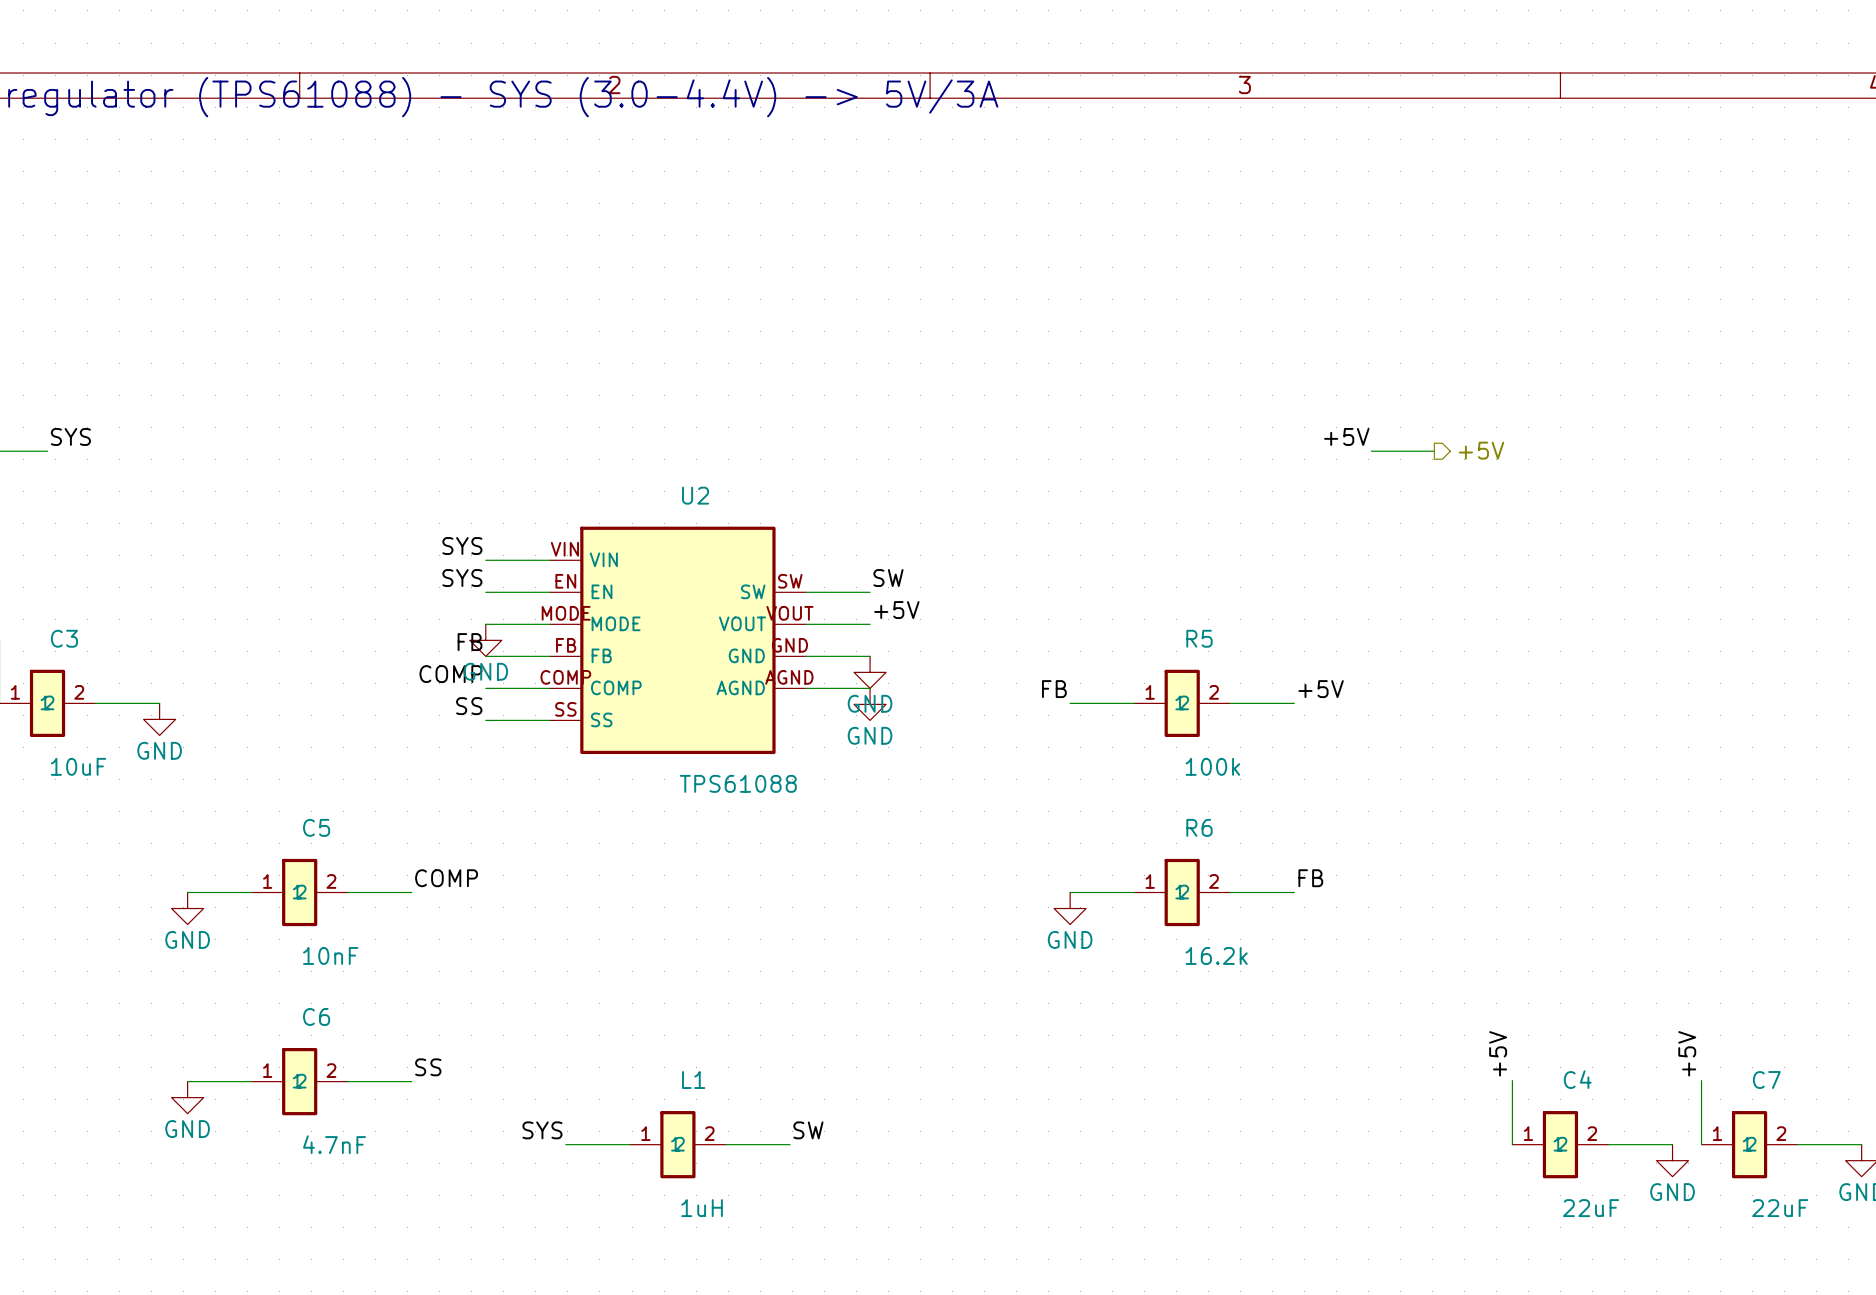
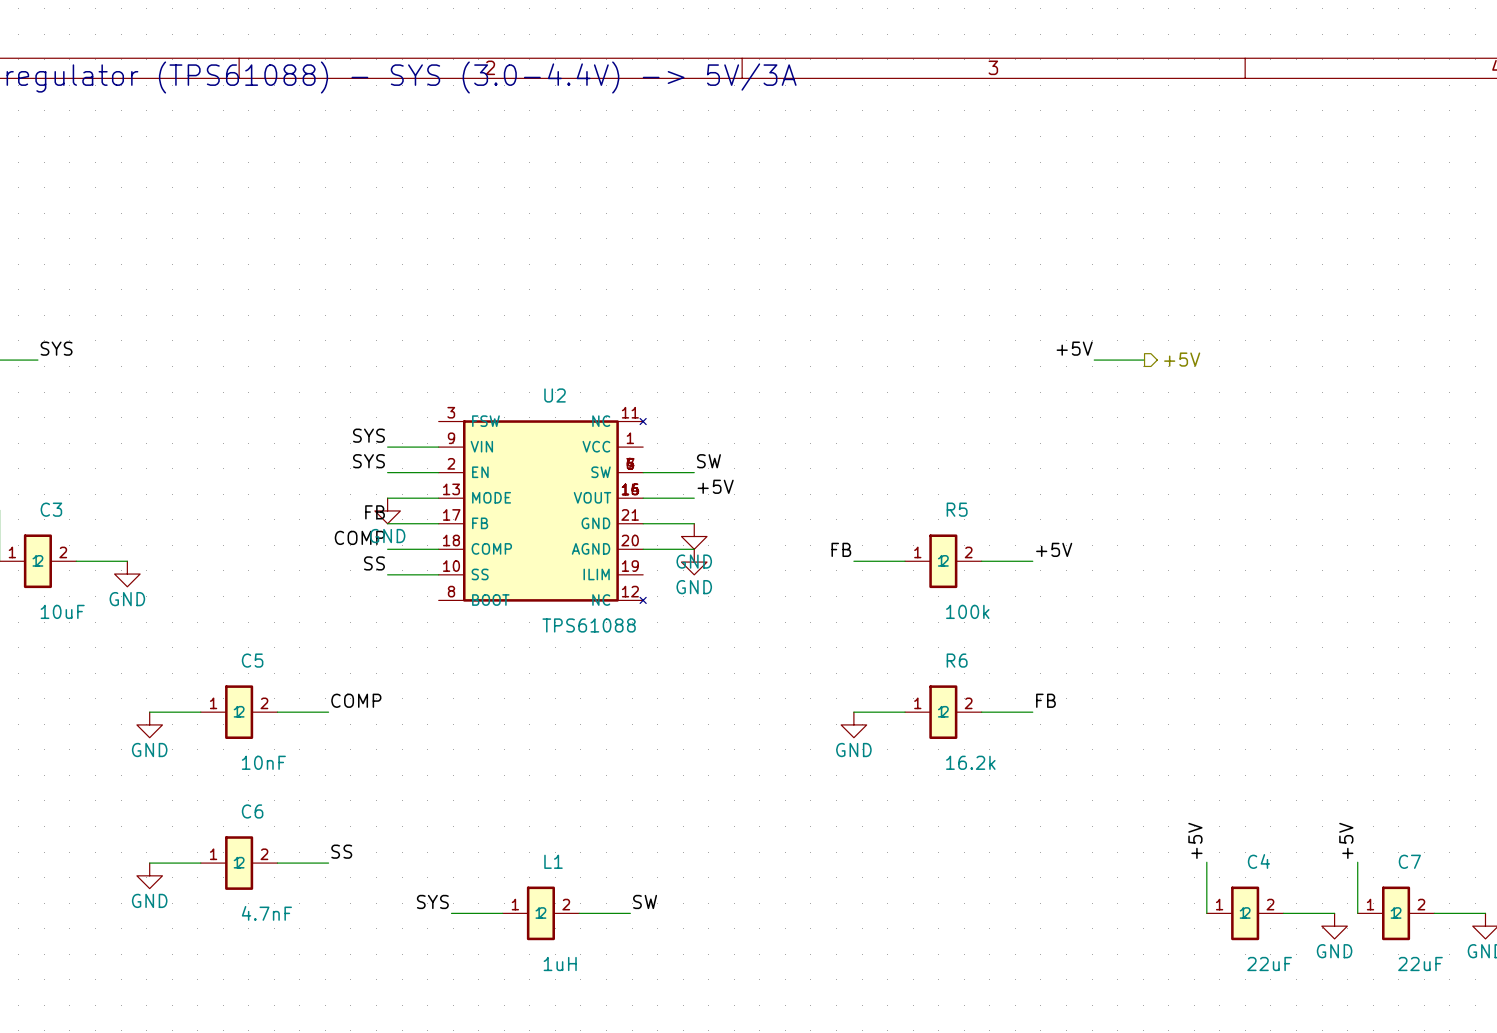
U2 symbol: [549, 526, 807, 755] -> [438, 418, 647, 604]

